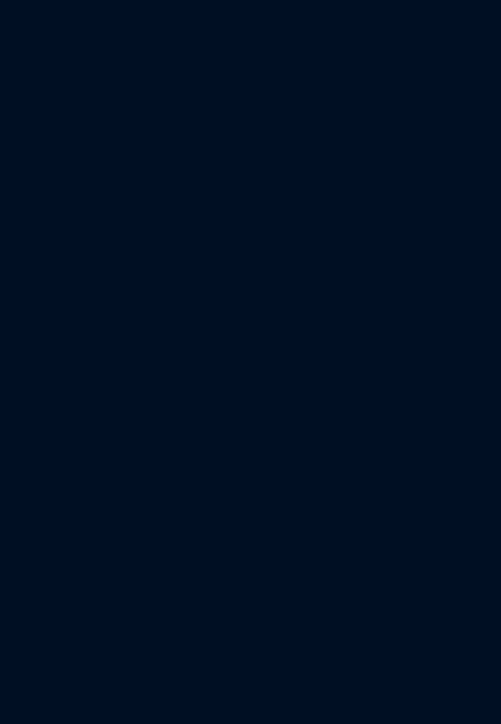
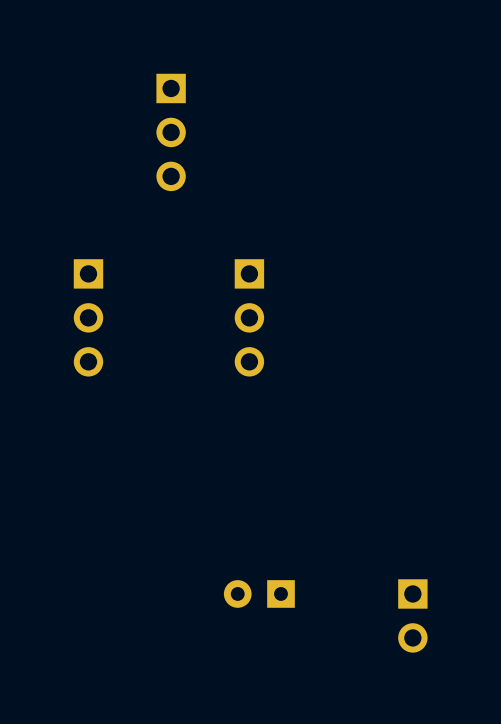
part: none -> (171, 132)
part: none -> (88, 317)
part: none -> (249, 317)
part: none -> (259, 593)
part: none -> (412, 615)

